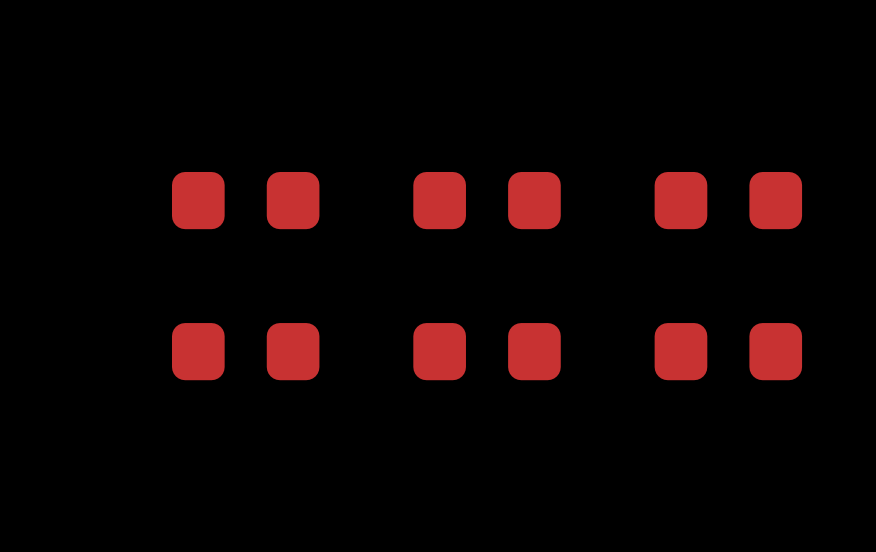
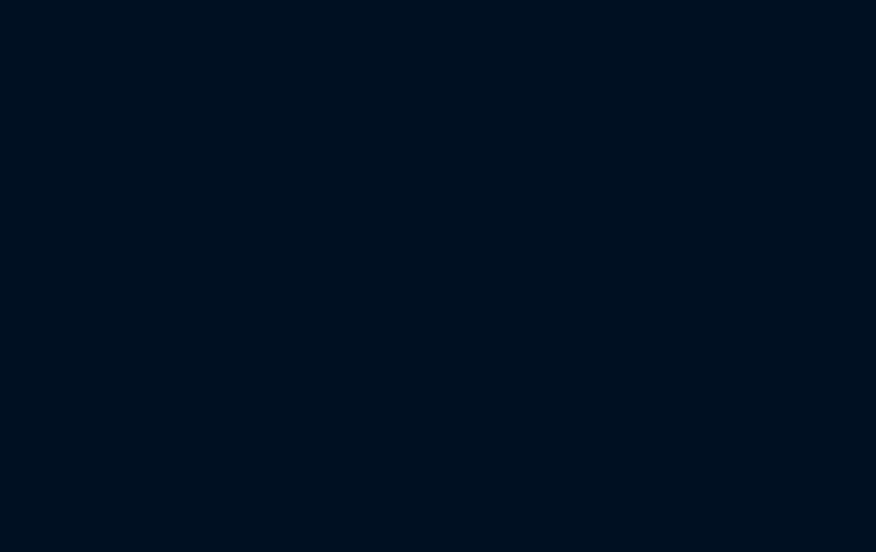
part: (245, 200) -> none
part: (487, 200) -> none
part: (728, 200) -> none
part: (245, 351) -> none
part: (487, 351) -> none
part: (728, 351) -> none

